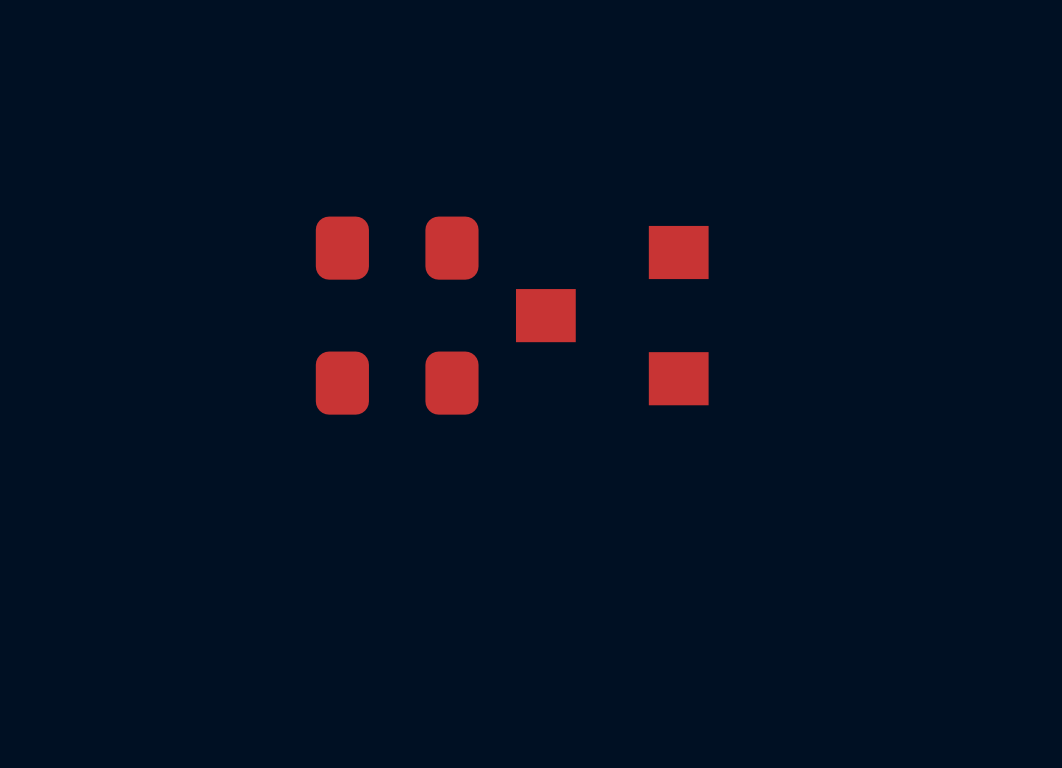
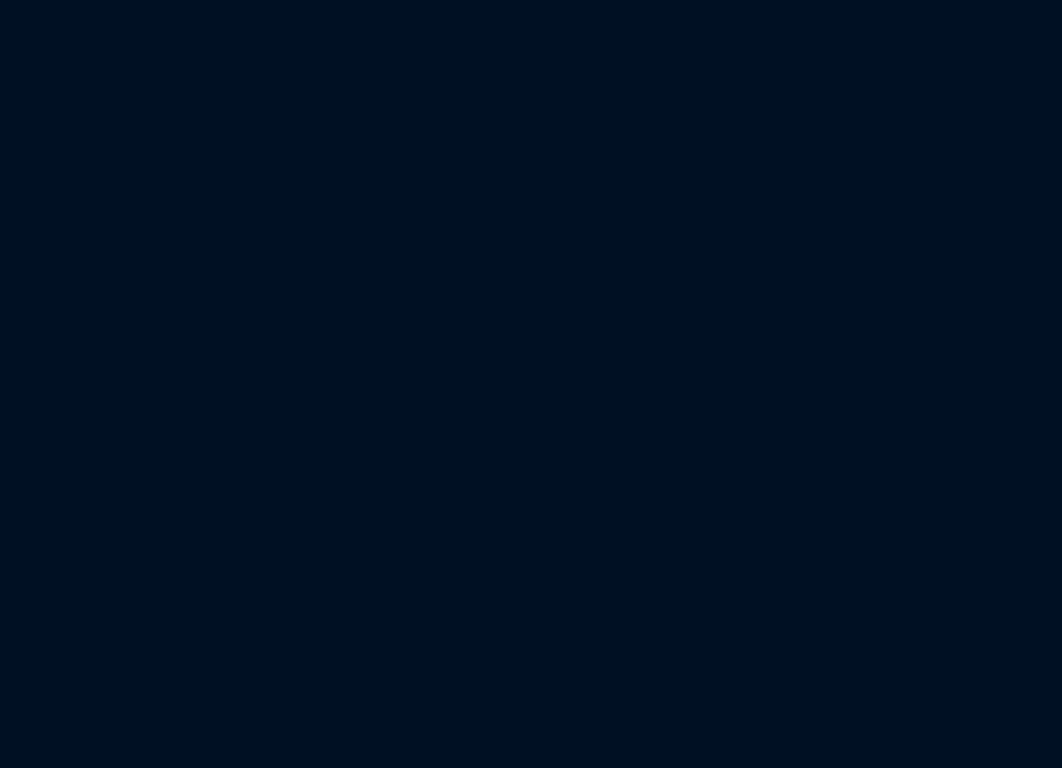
part: (397, 248) -> none
part: (612, 315) -> none
part: (397, 383) -> none

